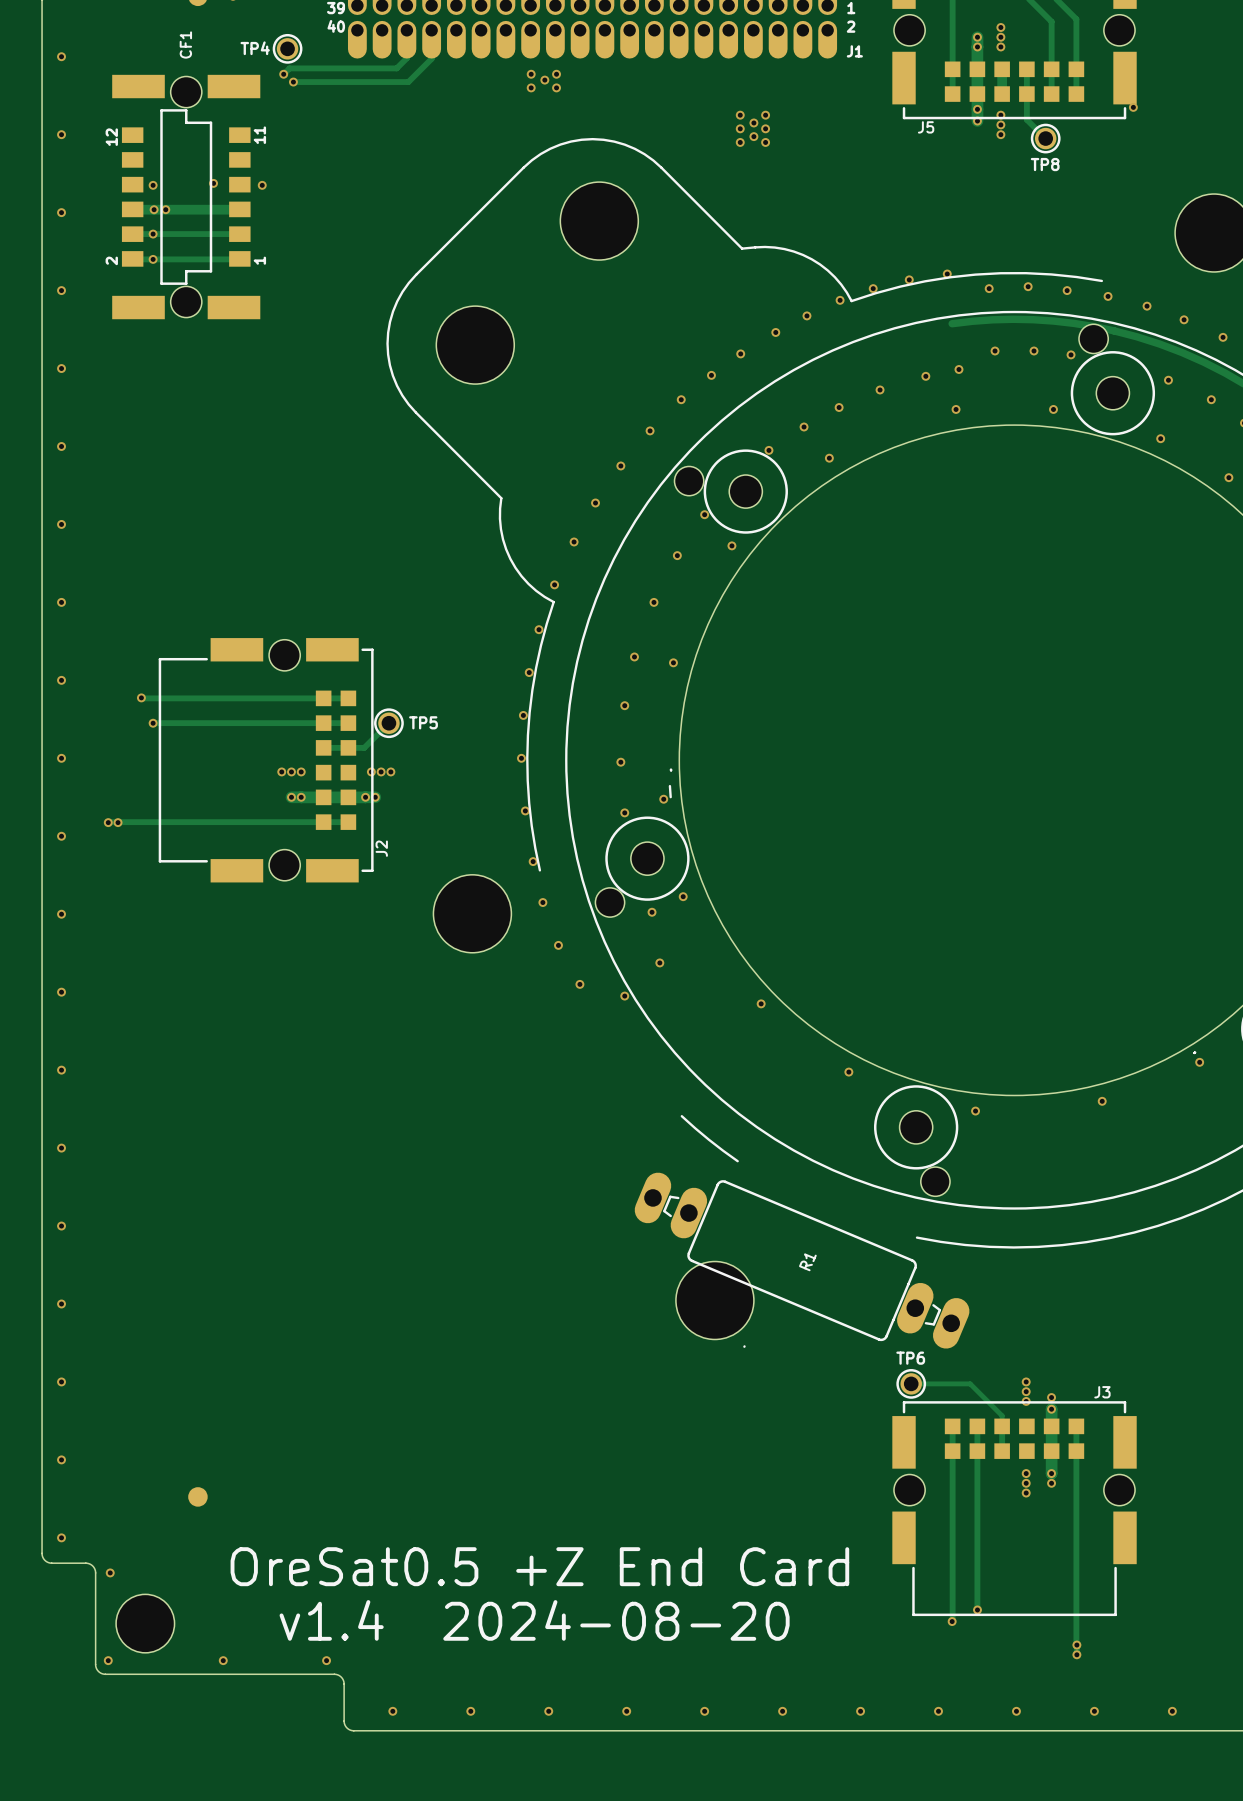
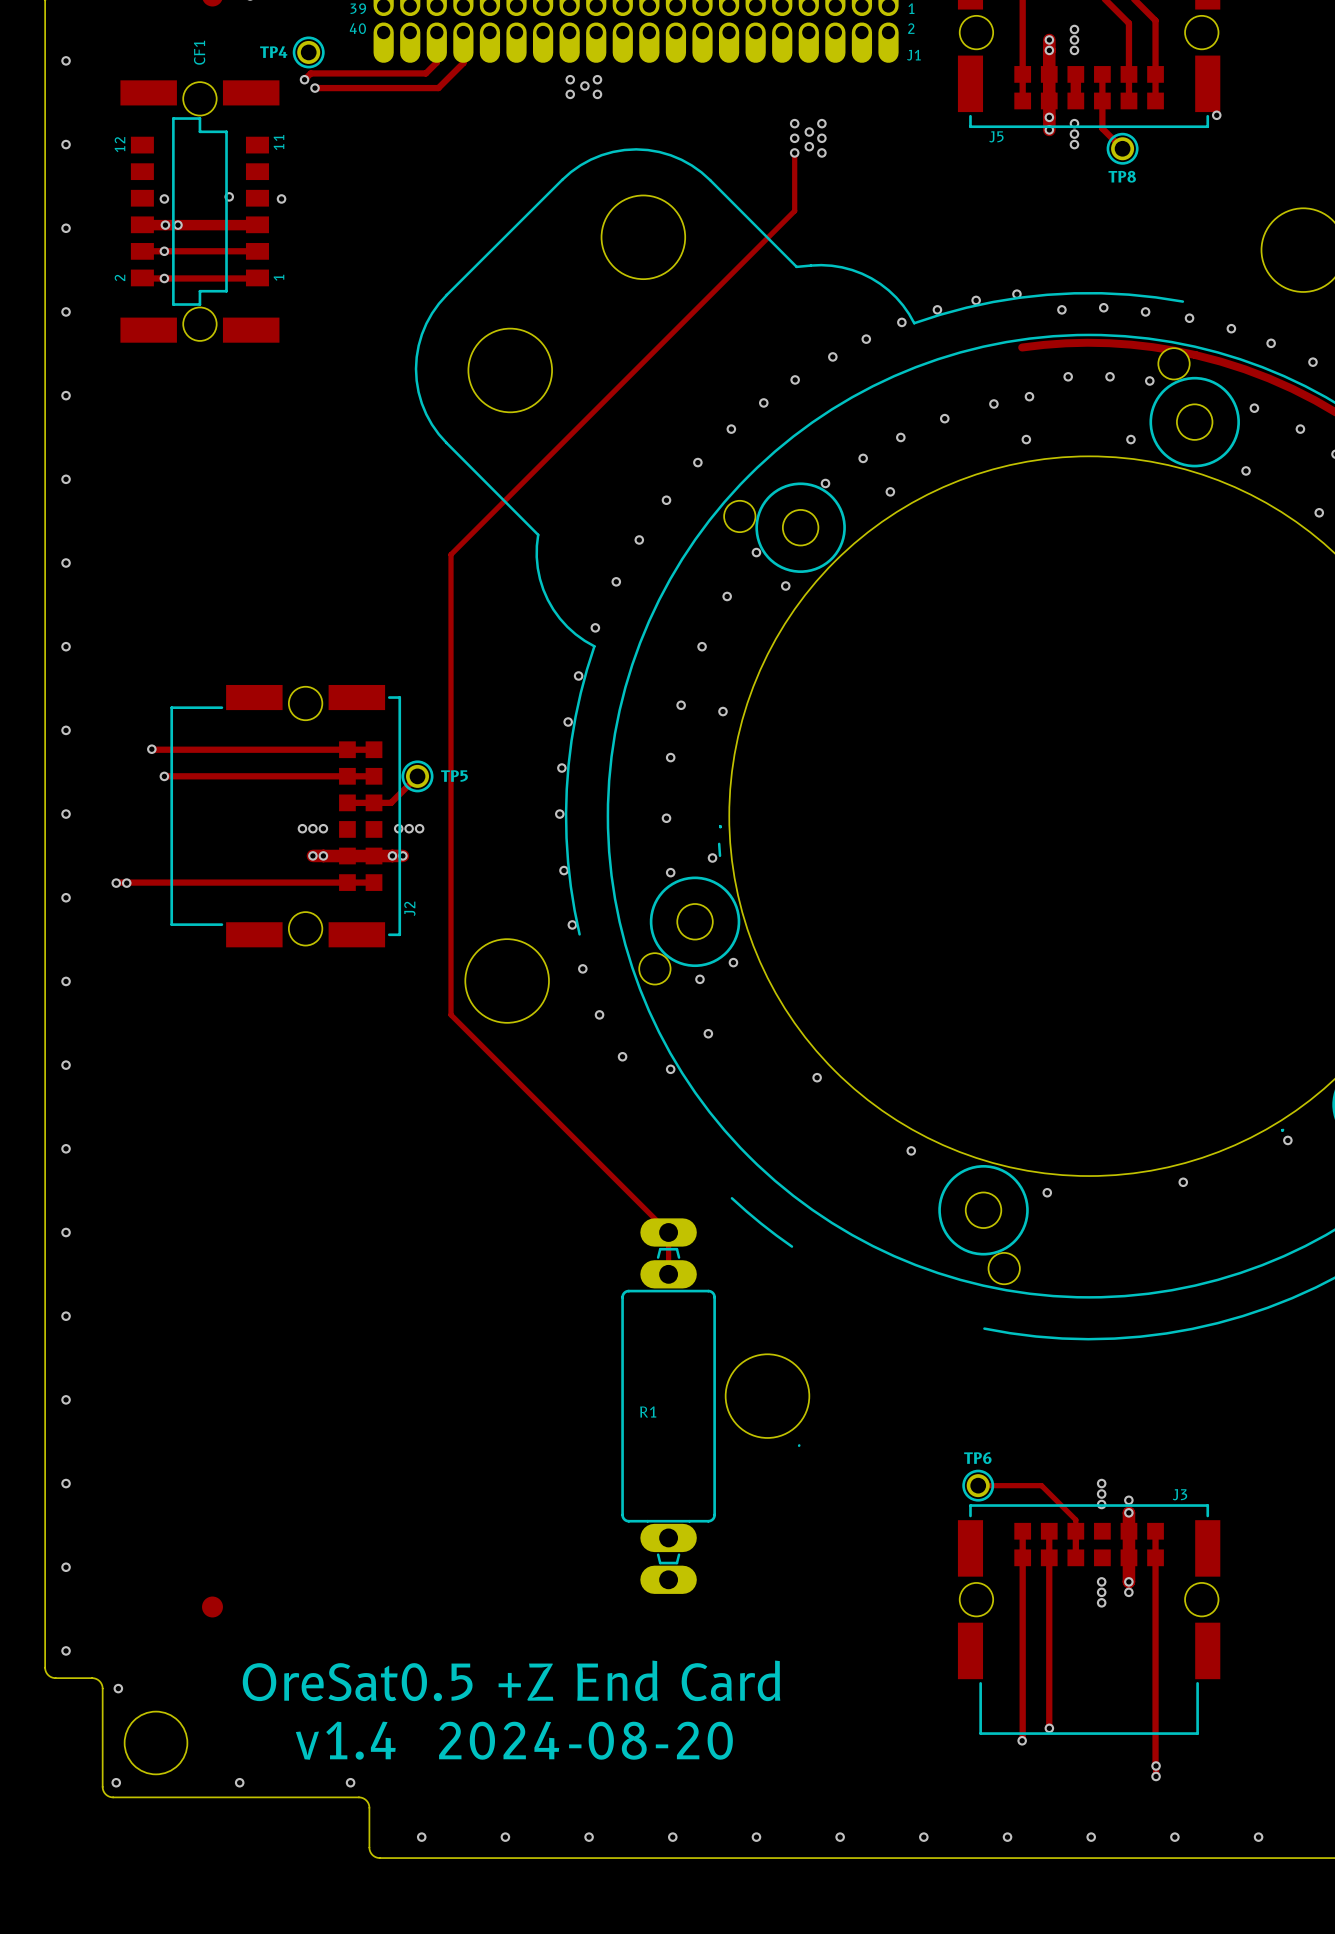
track: none -> (794, 152) (794, 210) (451, 554) (451, 1014) (668, 1232) (668, 1274)
R1 footprint: [634, 1172, 970, 1349] -> [621, 1218, 716, 1594]

